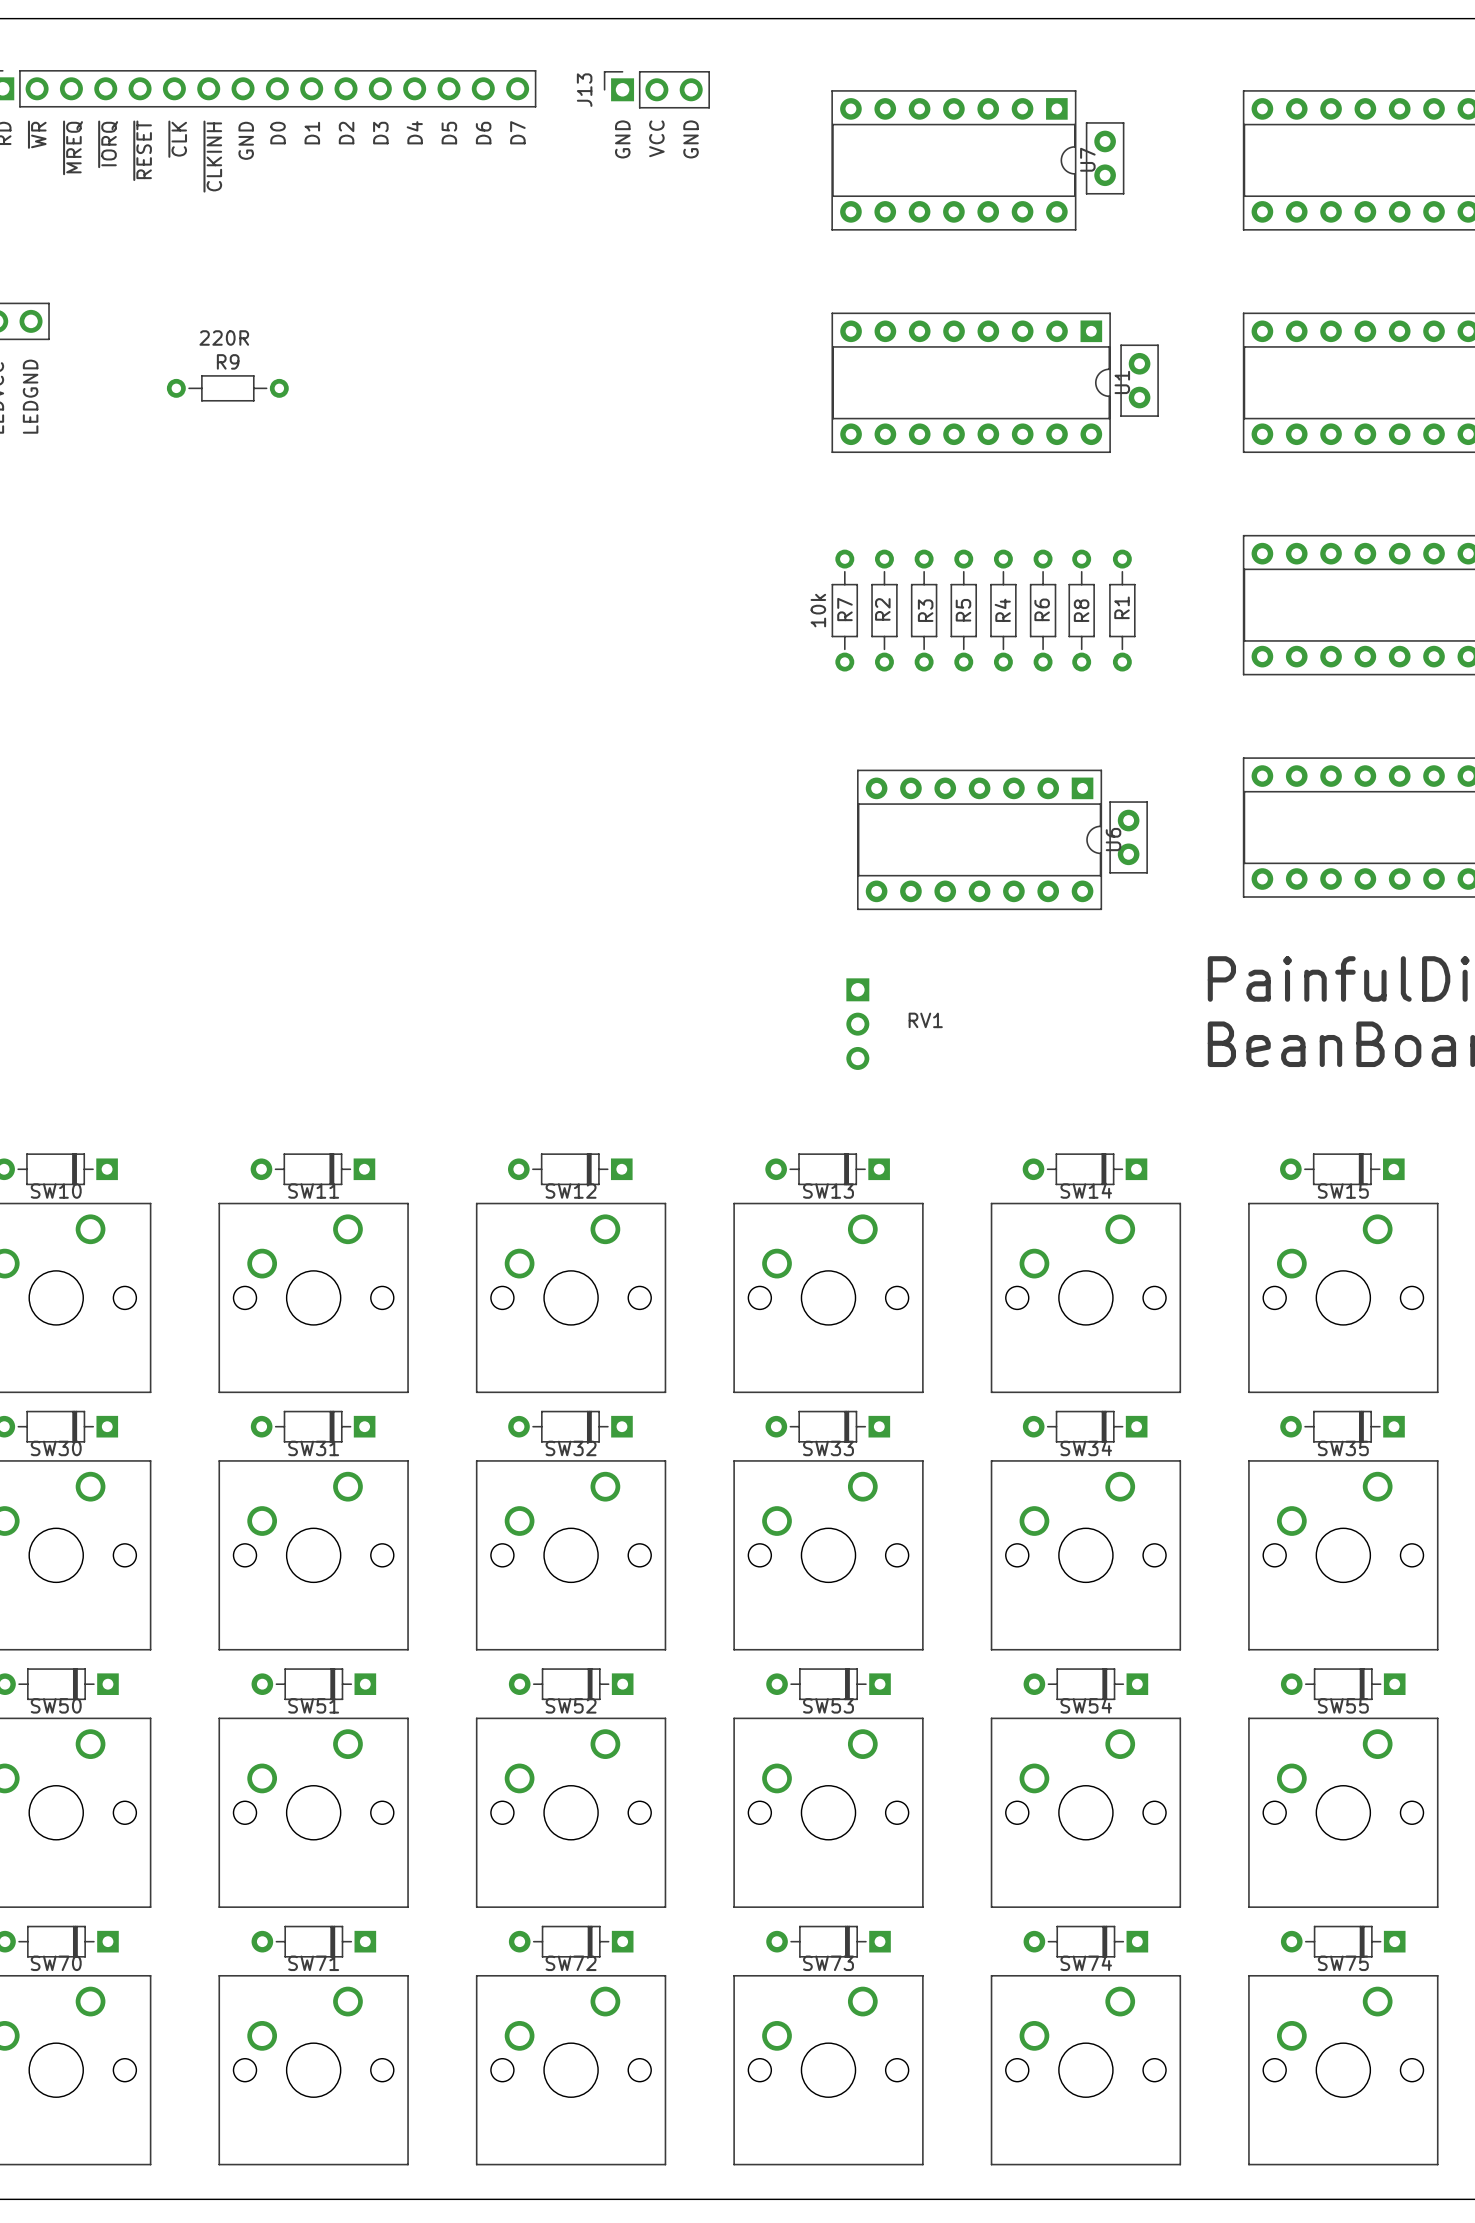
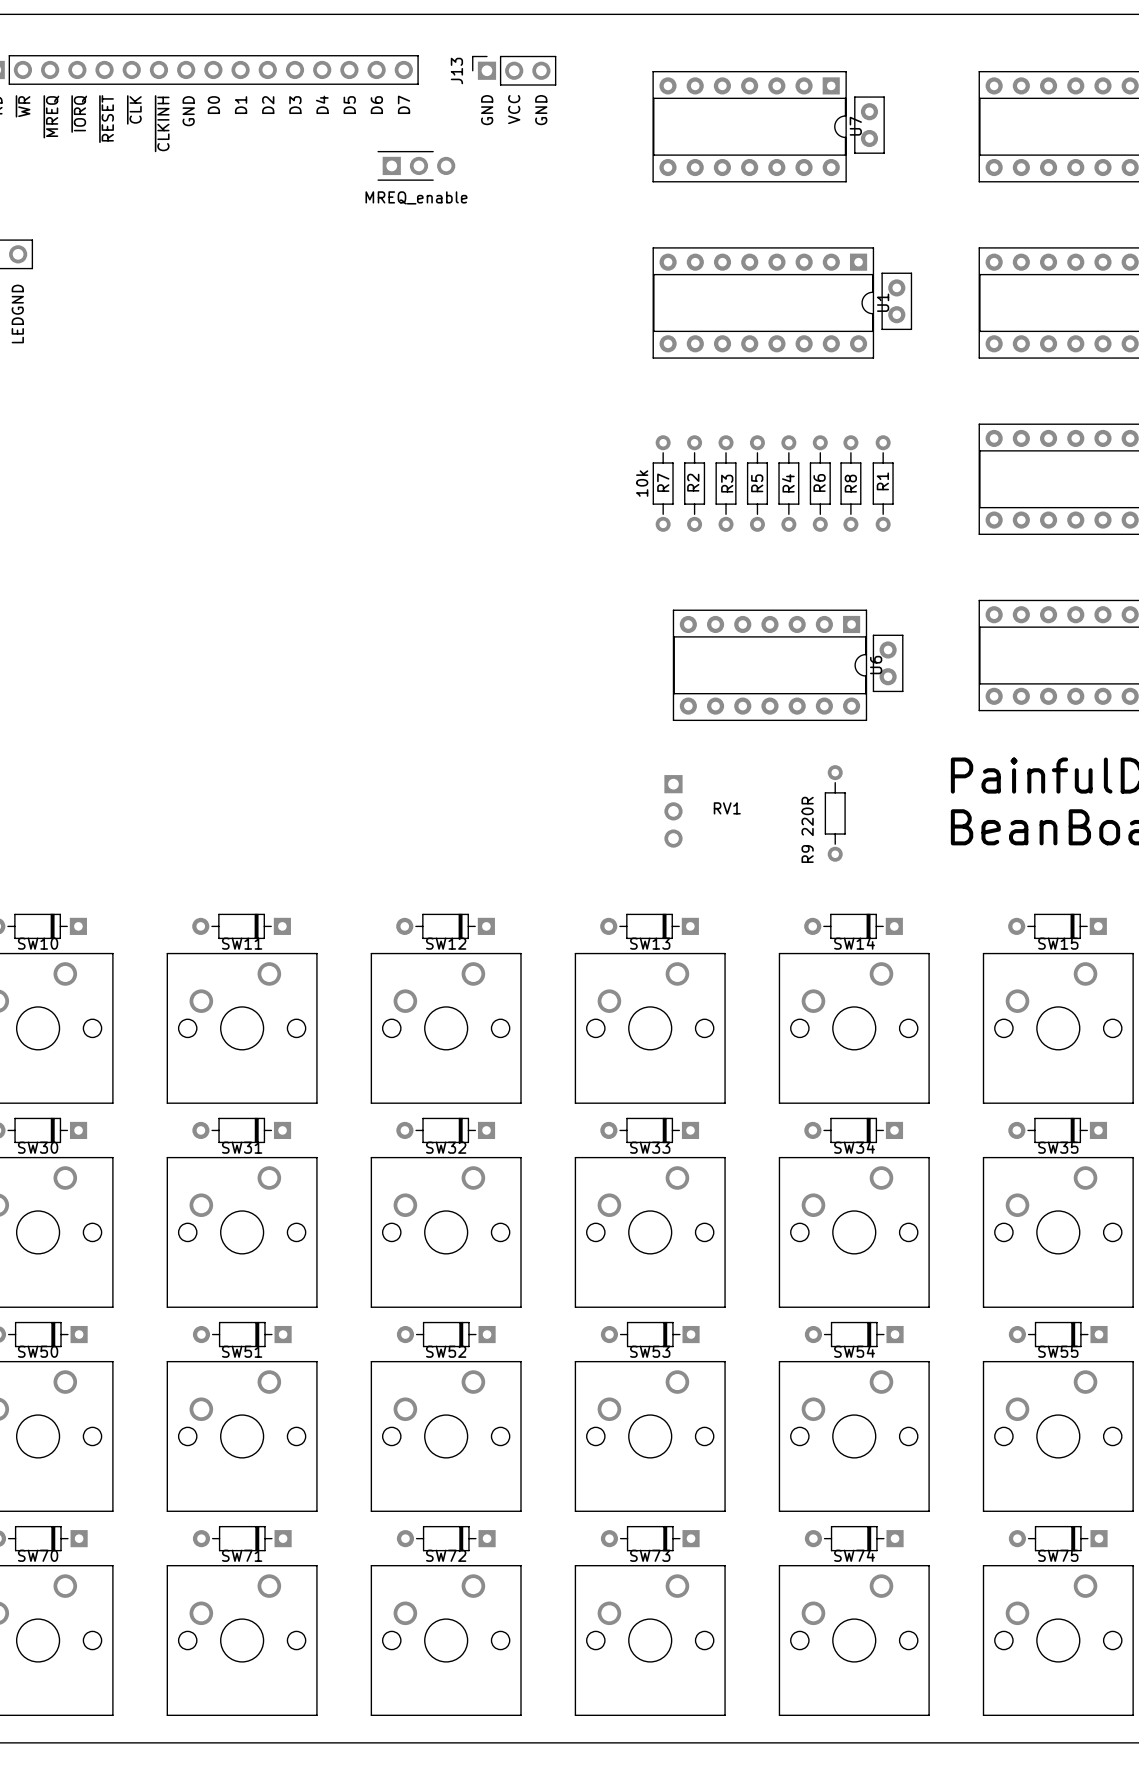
part: none -> MREQ_enable (416, 165)
R9 value position: 220R (224, 337) -> 220R (807, 816)
R9 name position: R9 (228, 361) -> R9 (807, 854)
R9 rotation: 0° (227, 388) -> 90° clockwise (835, 813)
R9 position: (227, 388) -> (835, 813)

